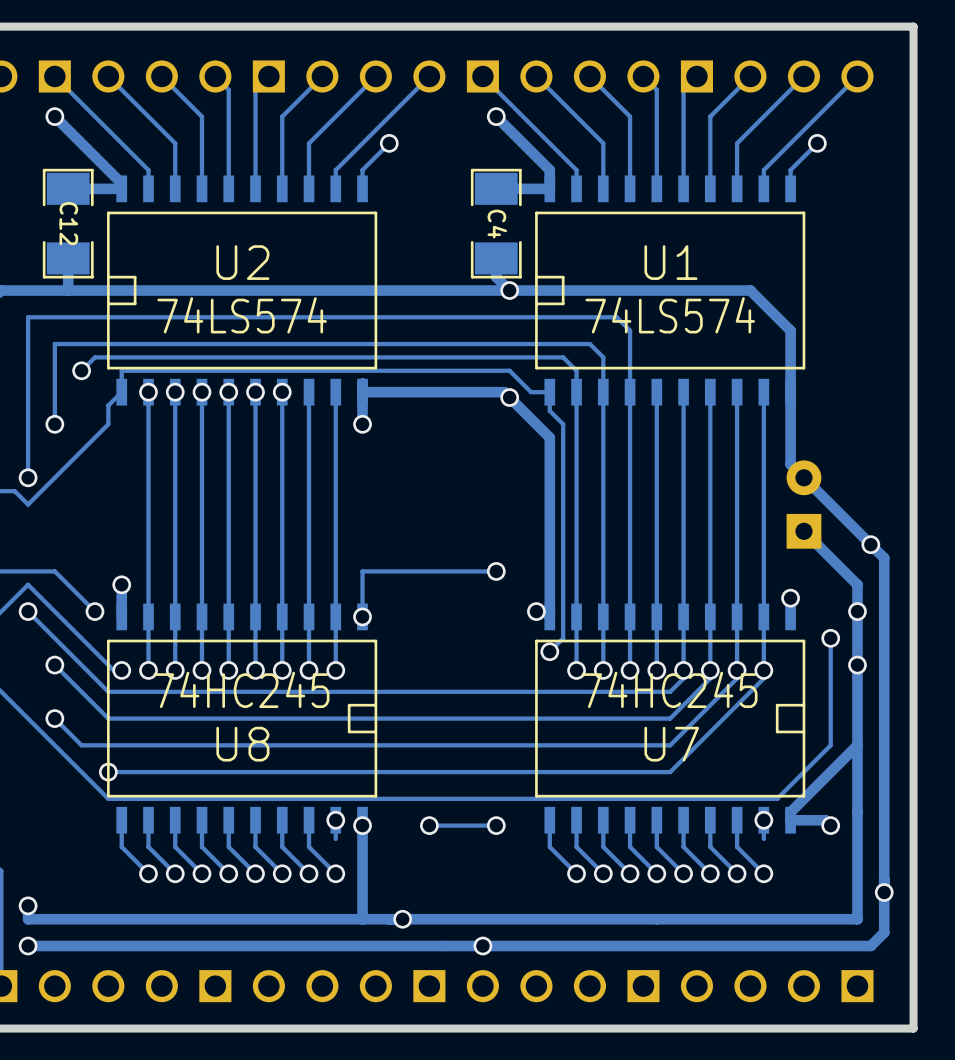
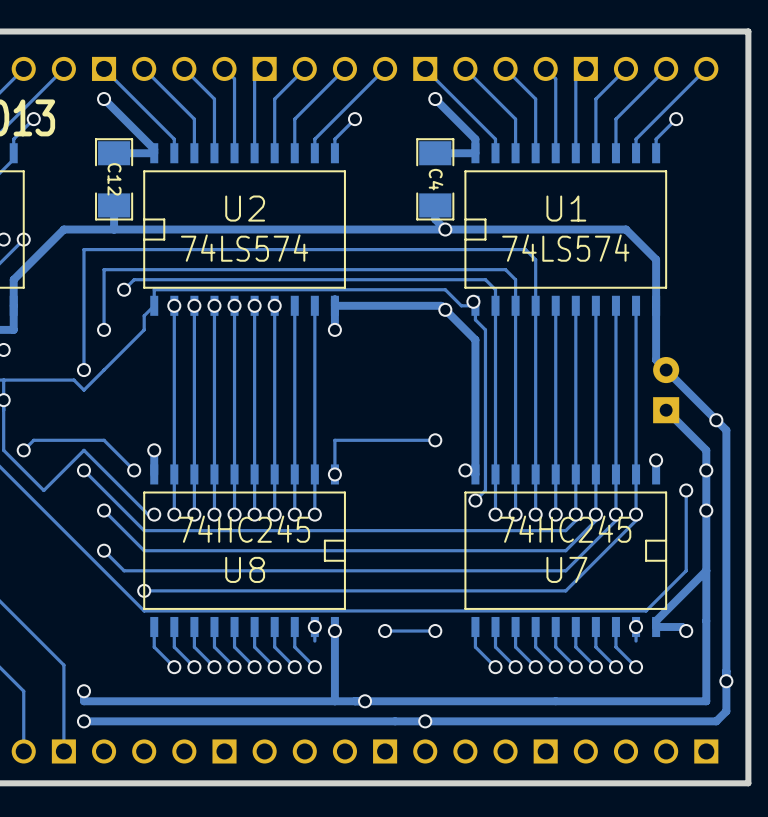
via: none -> (473, 301)

